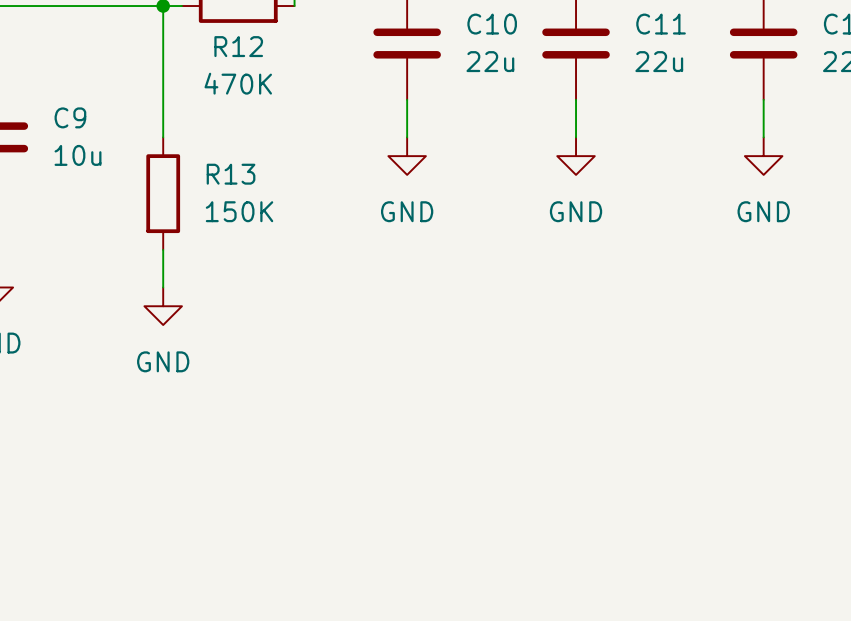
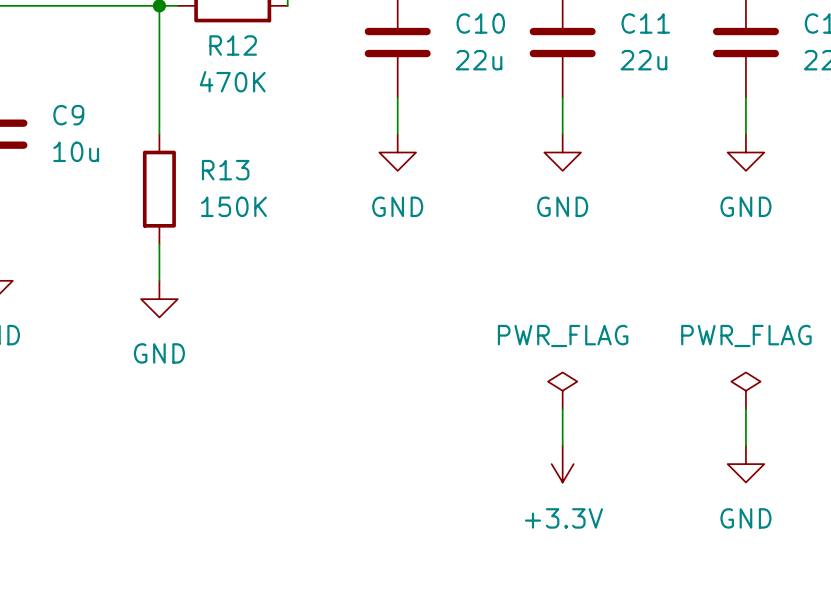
power symbol: none -> PWR_FLAG (562, 390)
power symbol: none -> PWR_FLAG (745, 390)
wire: none -> (562, 409) (562, 445)
wire: none -> (745, 409) (745, 445)
power symbol: none -> +3.3V (562, 464)
power symbol: none -> GND (745, 464)

